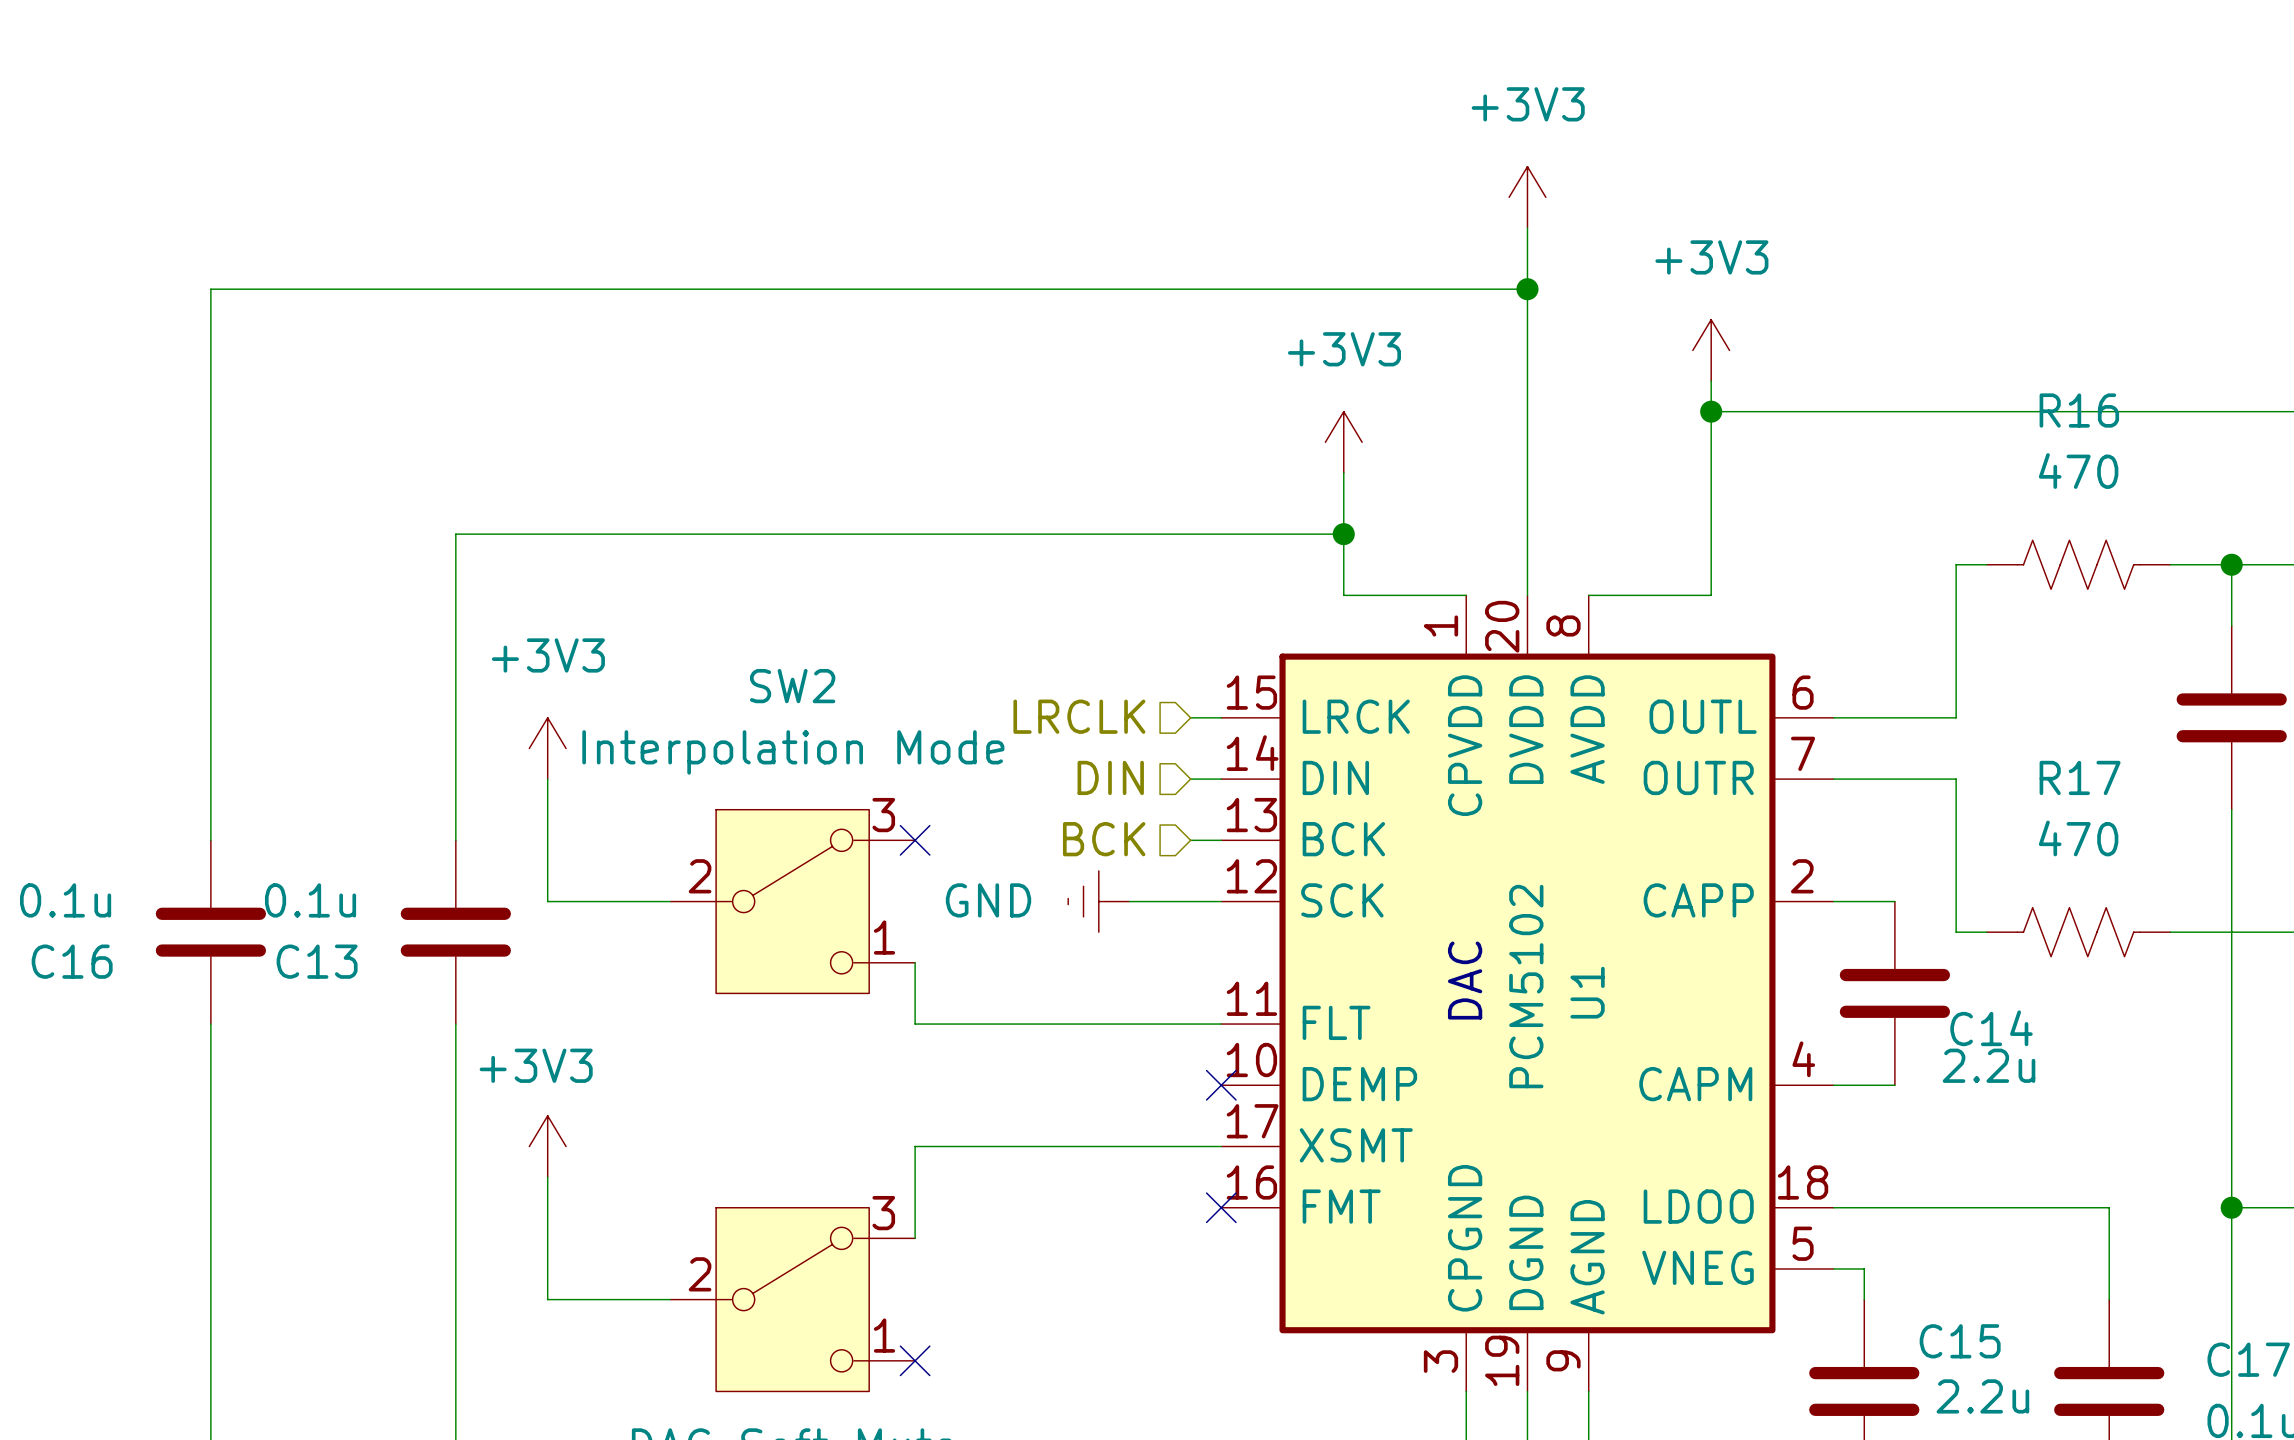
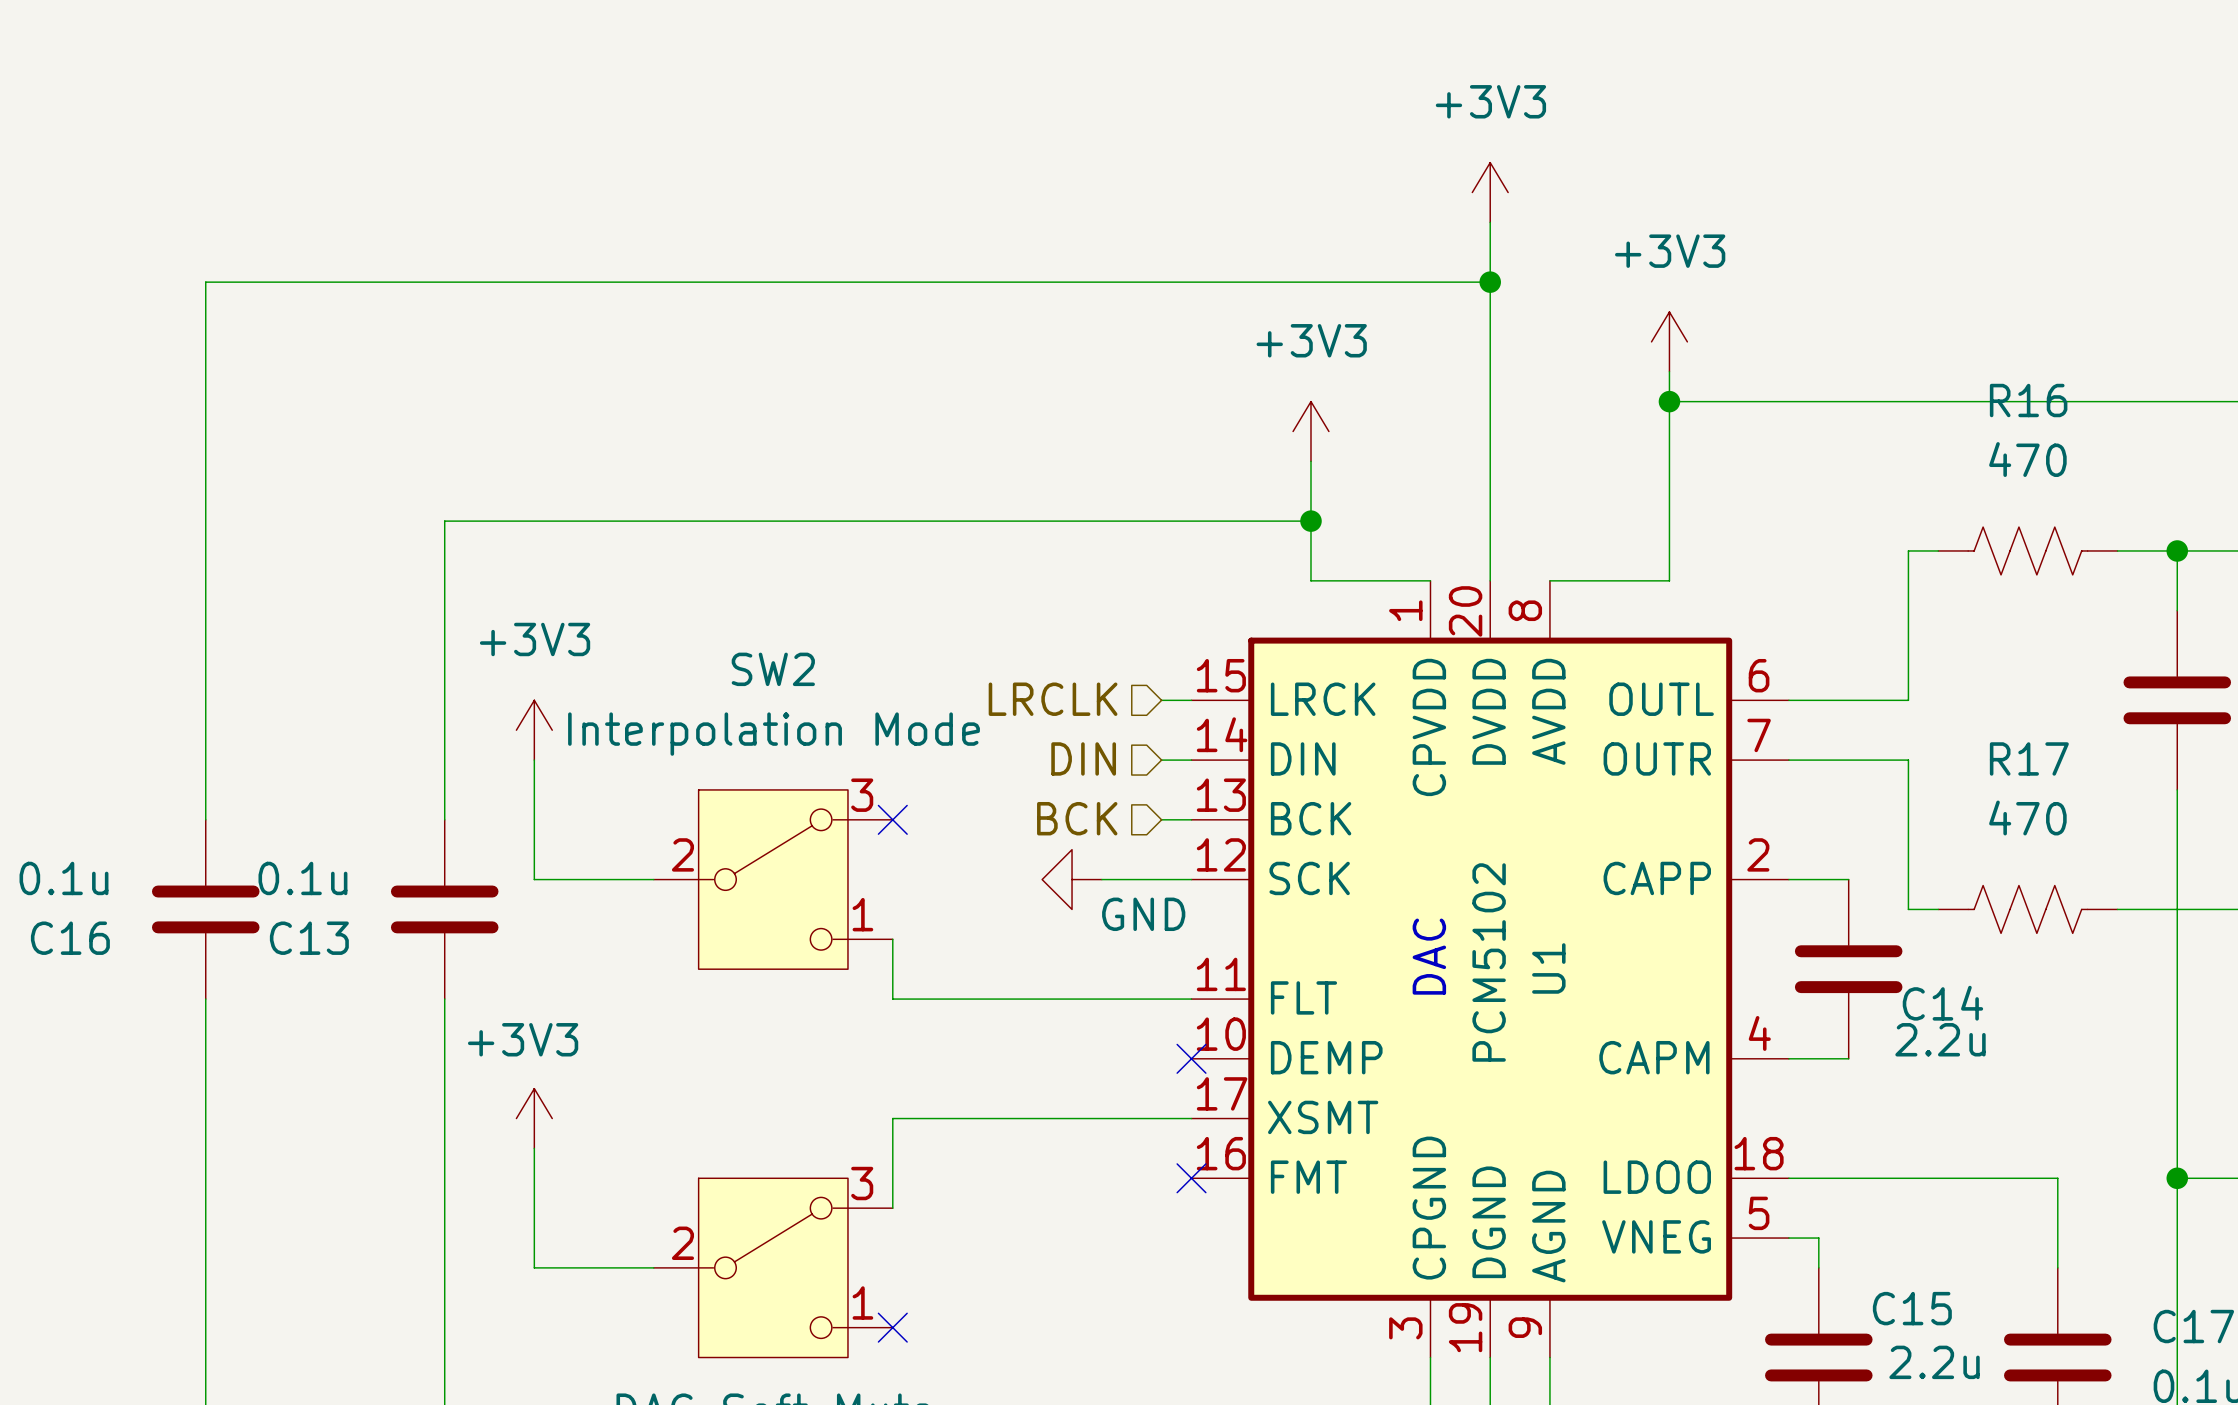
power symbol shape: [1068, 870, 1130, 933] -> [1042, 849, 1102, 910]
power symbol text position: GND (988, 900) -> GND (1143, 914)

